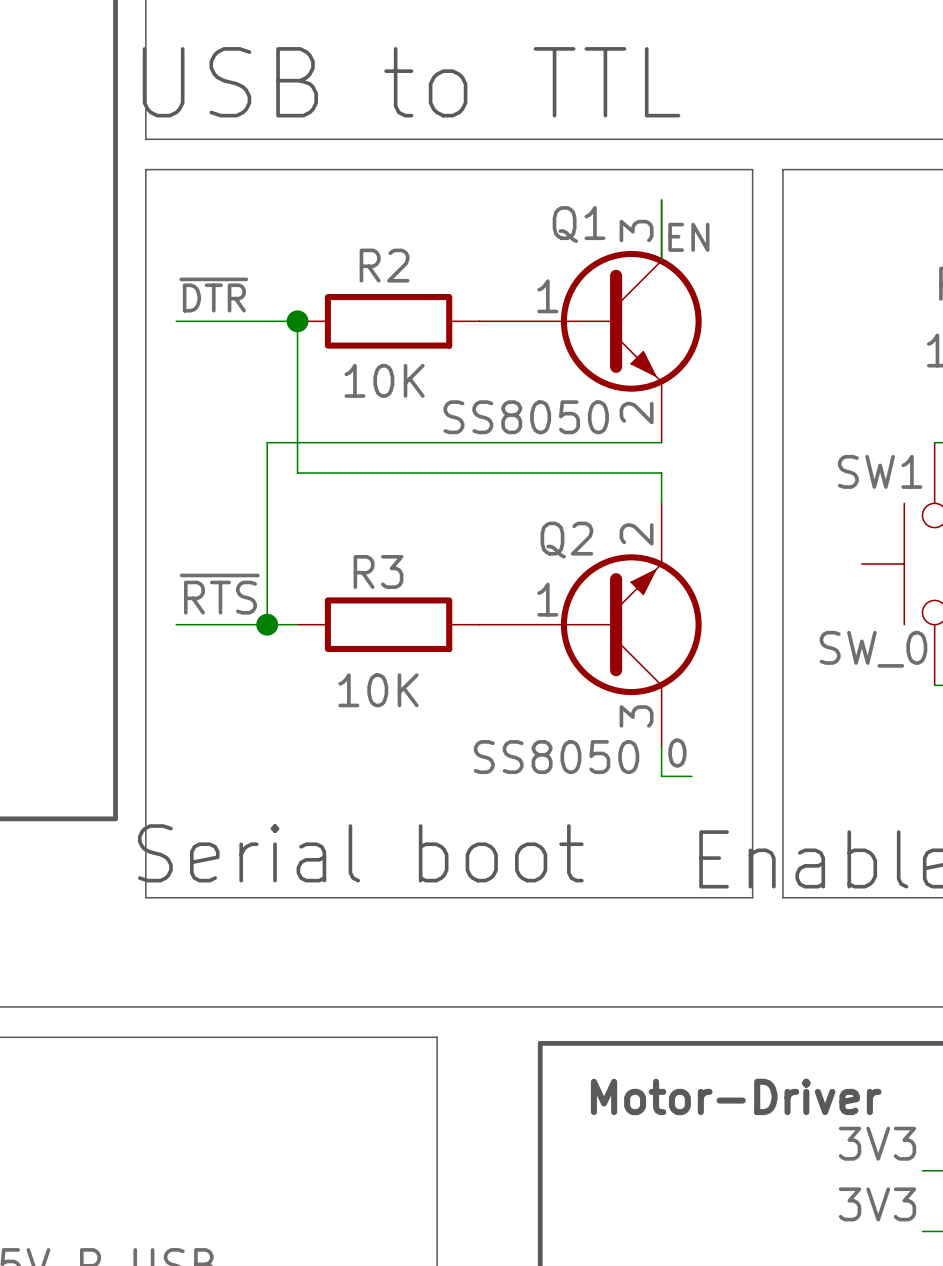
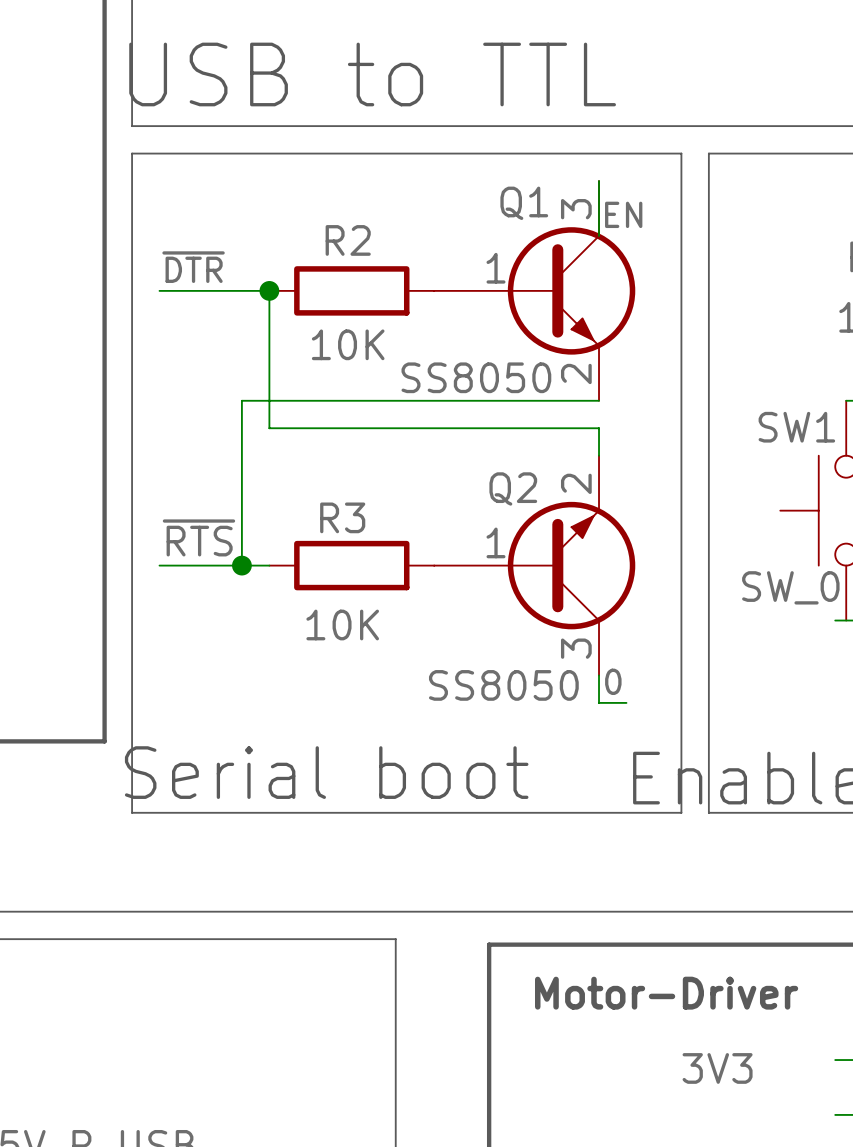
wire: none -> (835, 620) (846, 620)
label: 3V3 (877, 1143) -> none
label: none -> 3V3 (717, 1068)
label: 3V3 (877, 1204) -> none

